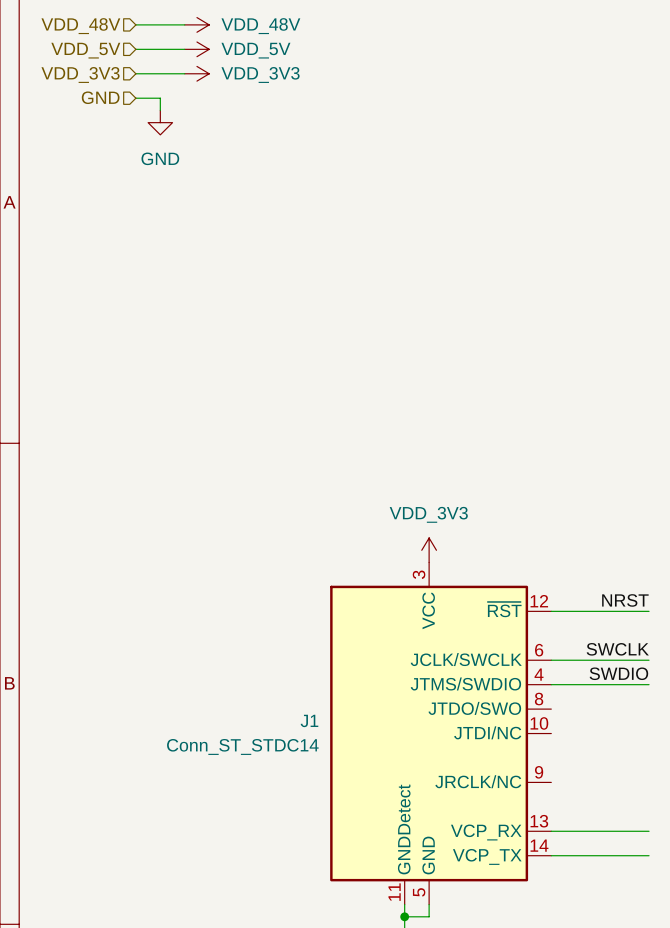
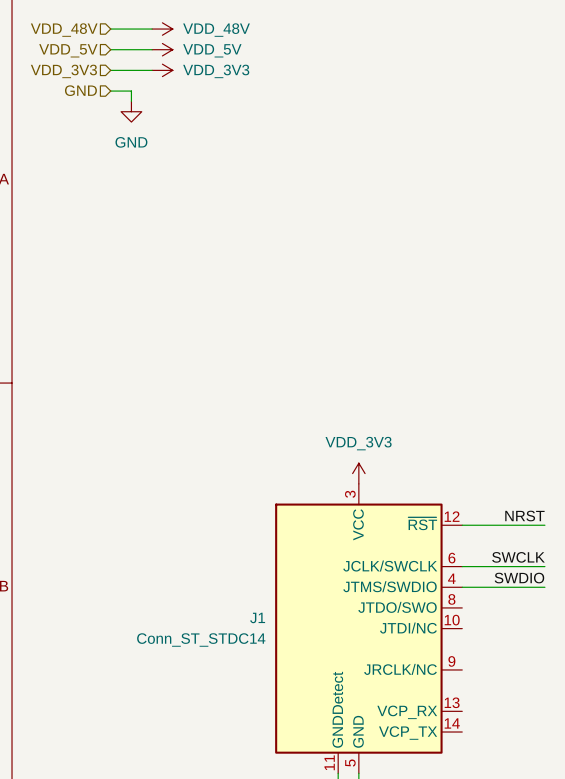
wire: (551, 831) (649, 831) -> none
wire: (551, 855) (649, 855) -> none

